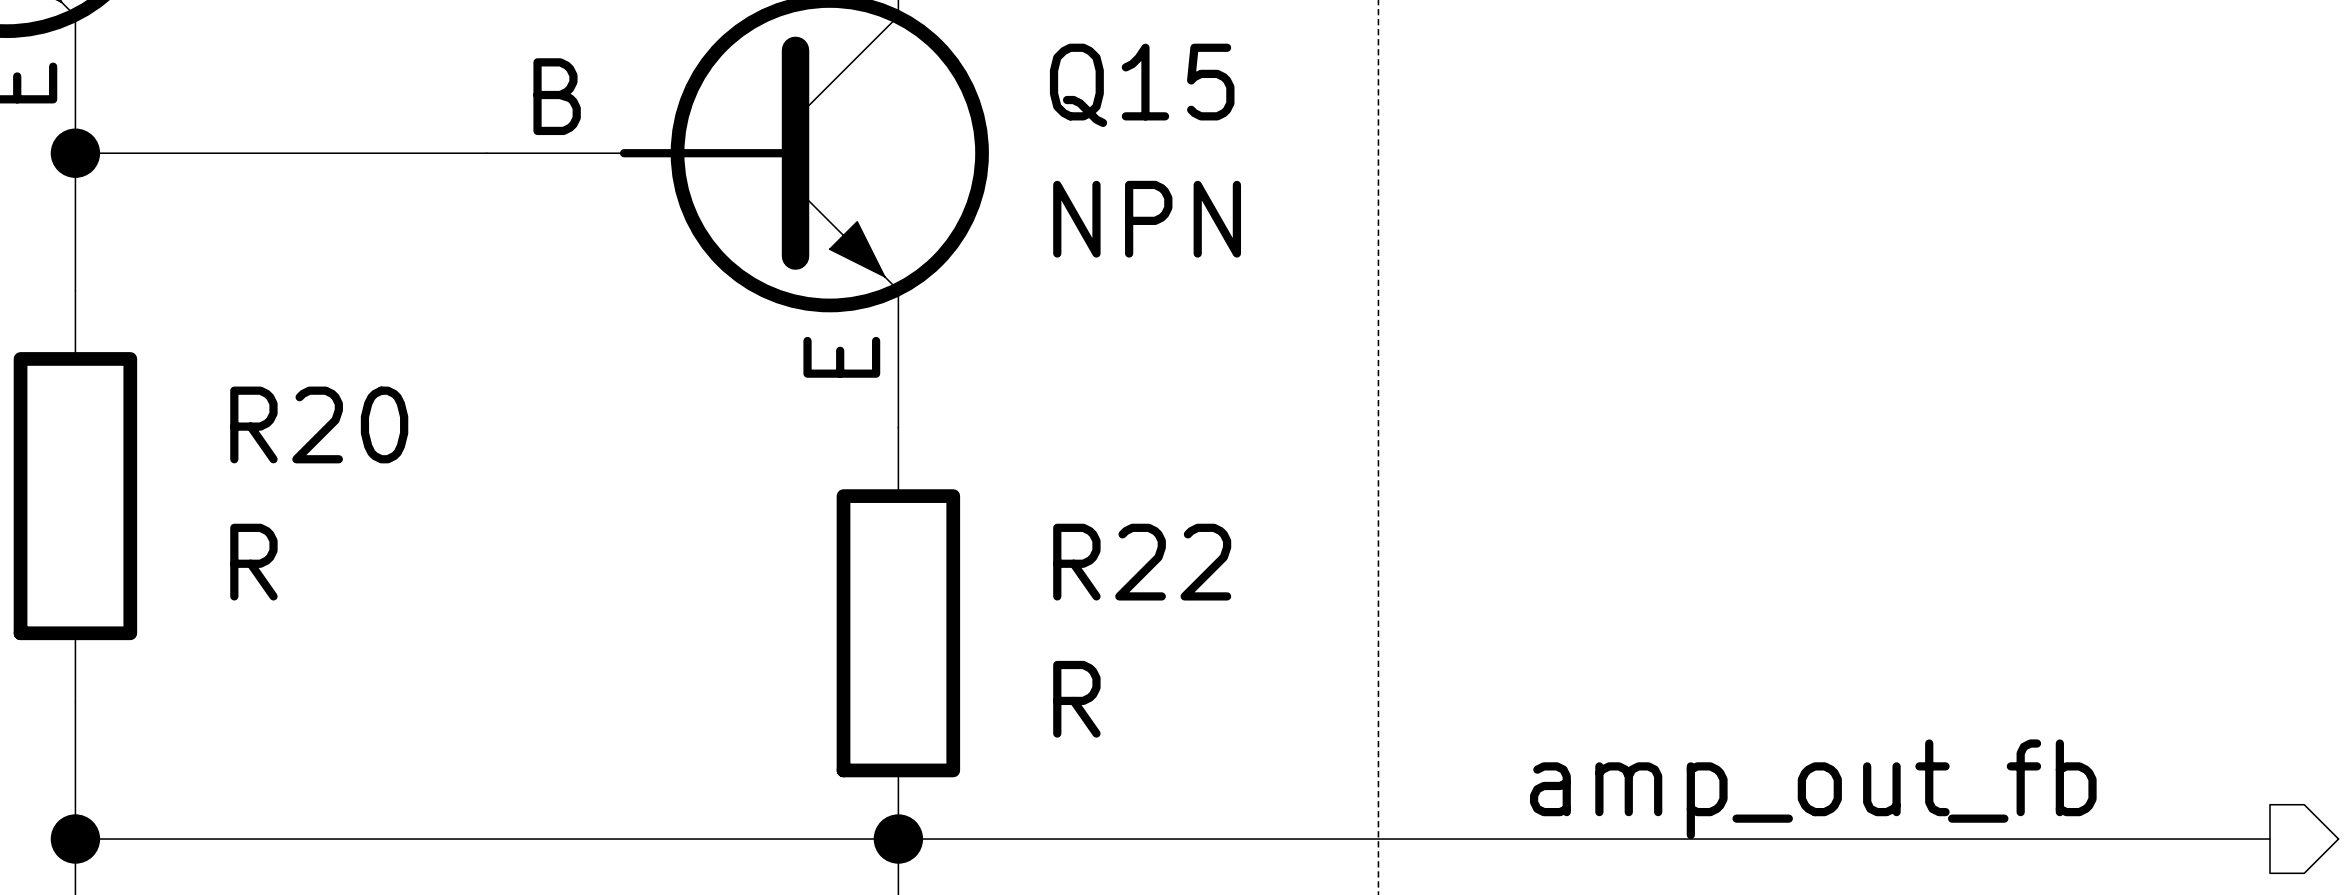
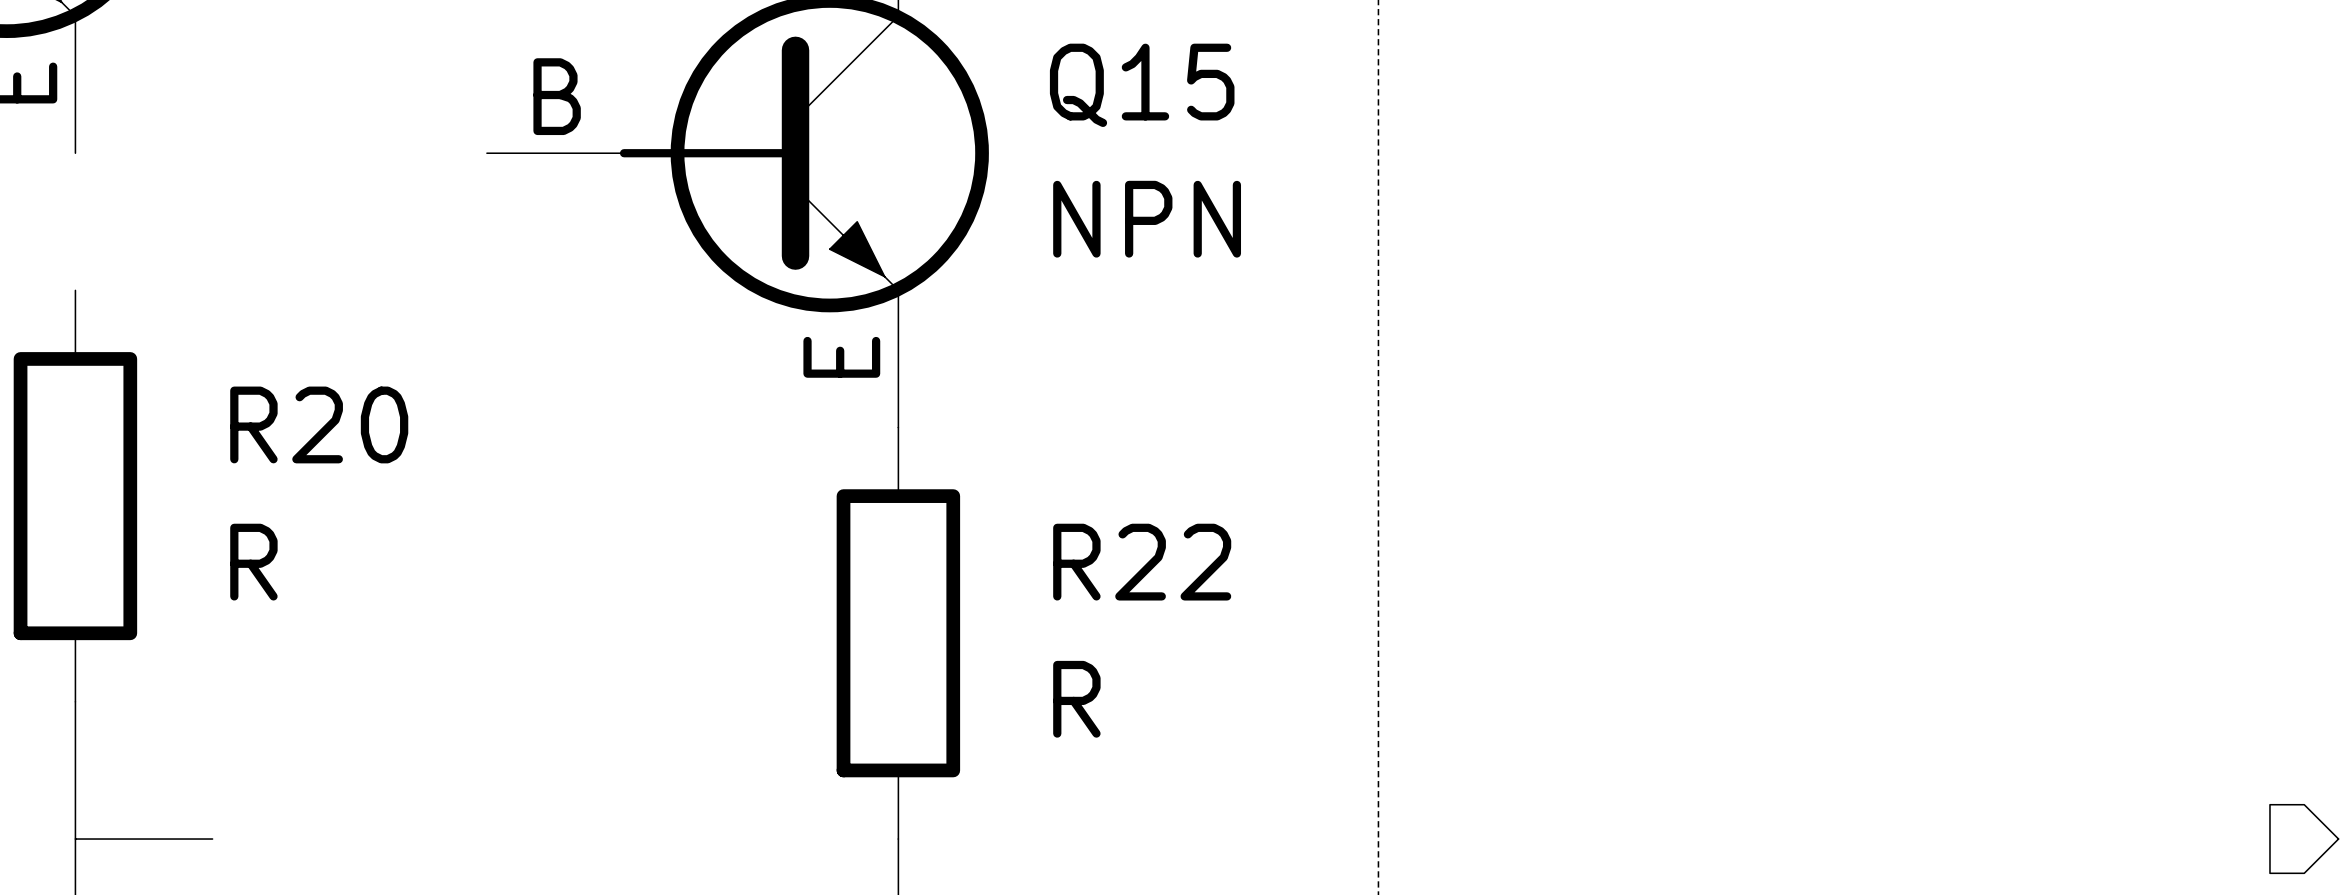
junction: (75, 153) -> none
wire: (486, 153) (75, 153) (75, 290) -> none
label: amp_out_fb (1813, 789) -> none
junction: (75, 839) -> none
wire: (212, 839) (2269, 839) -> none
junction: (898, 839) -> none

